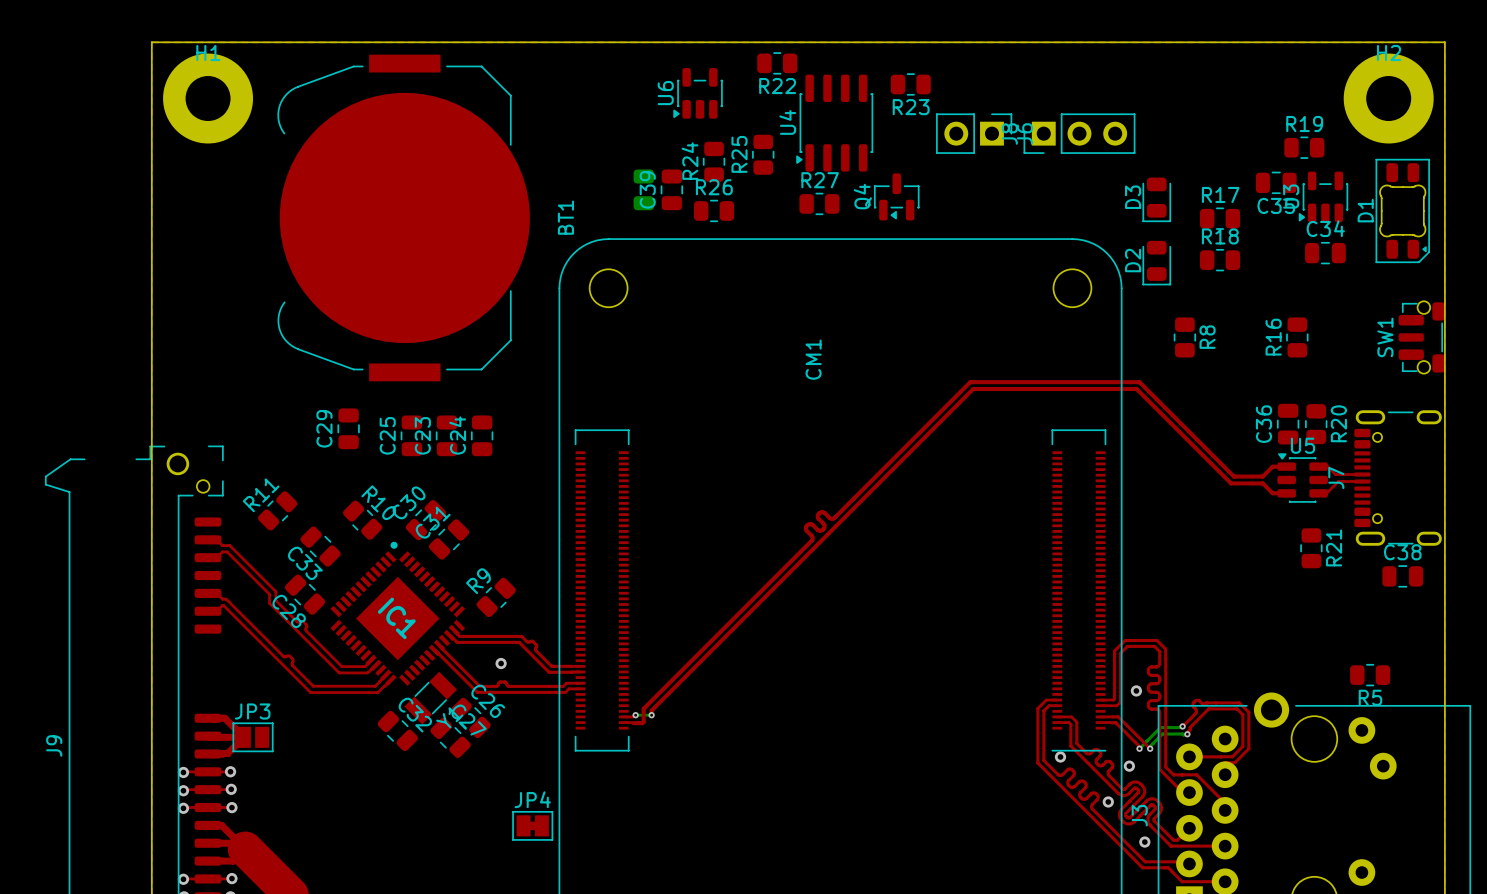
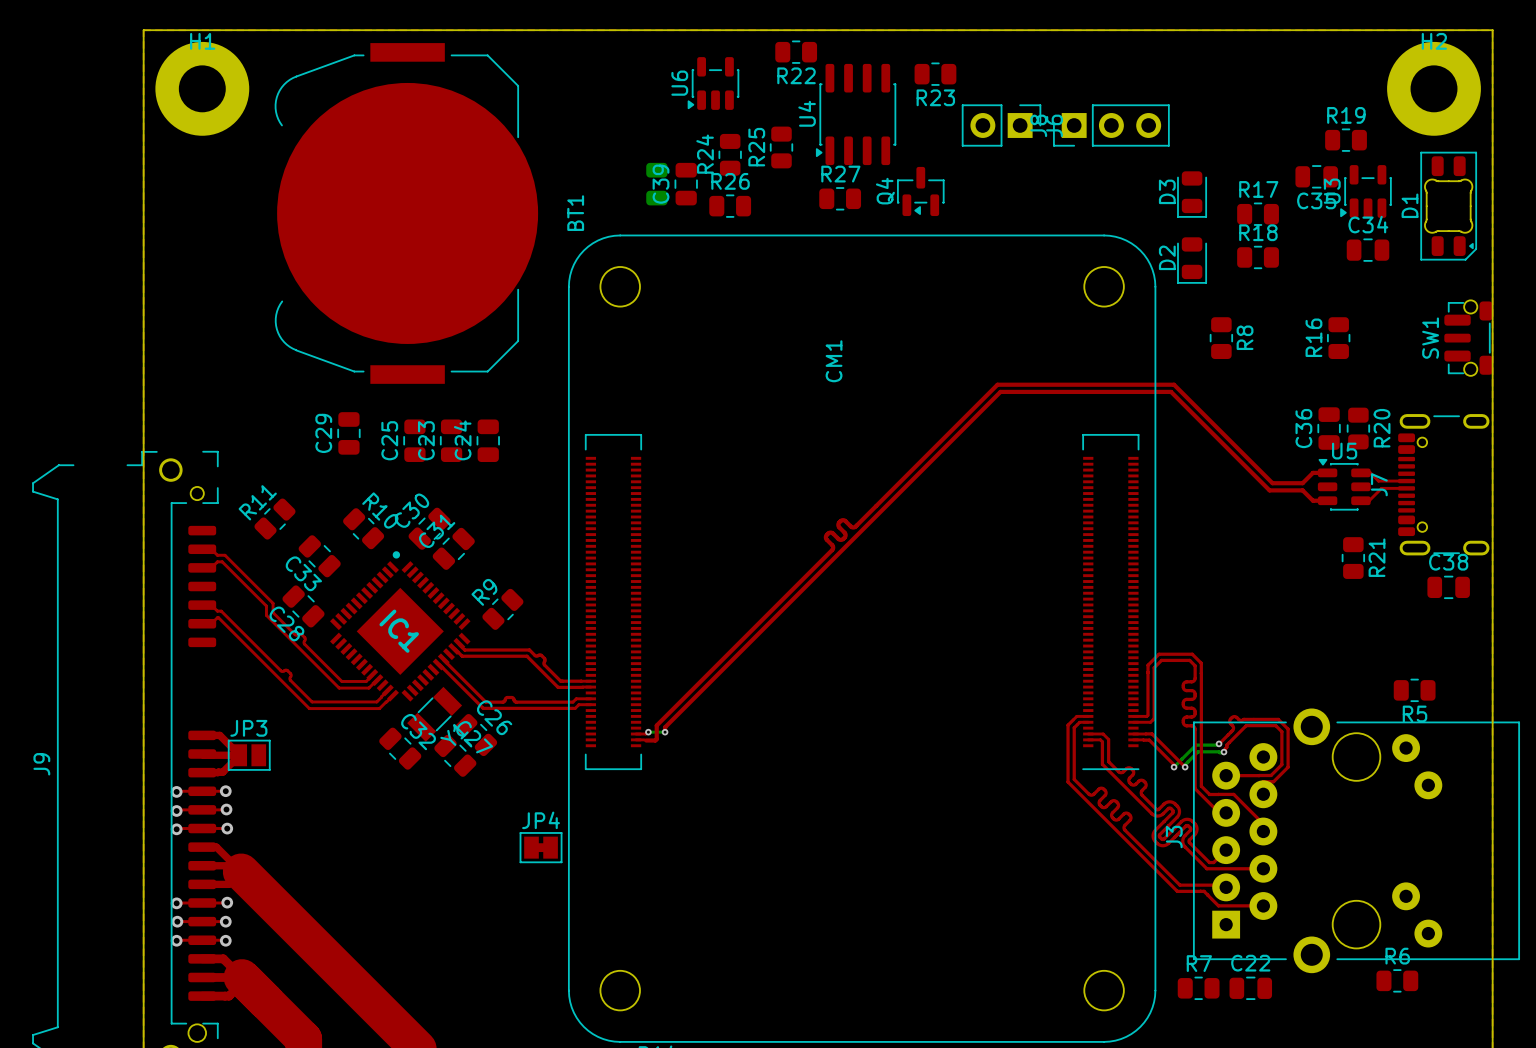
via: (501, 663) -> none
via: (1136, 690) -> none
via: (1060, 757) -> none
via: (1129, 766) -> none
via: (1108, 801) -> none
via: (1144, 842) -> none

